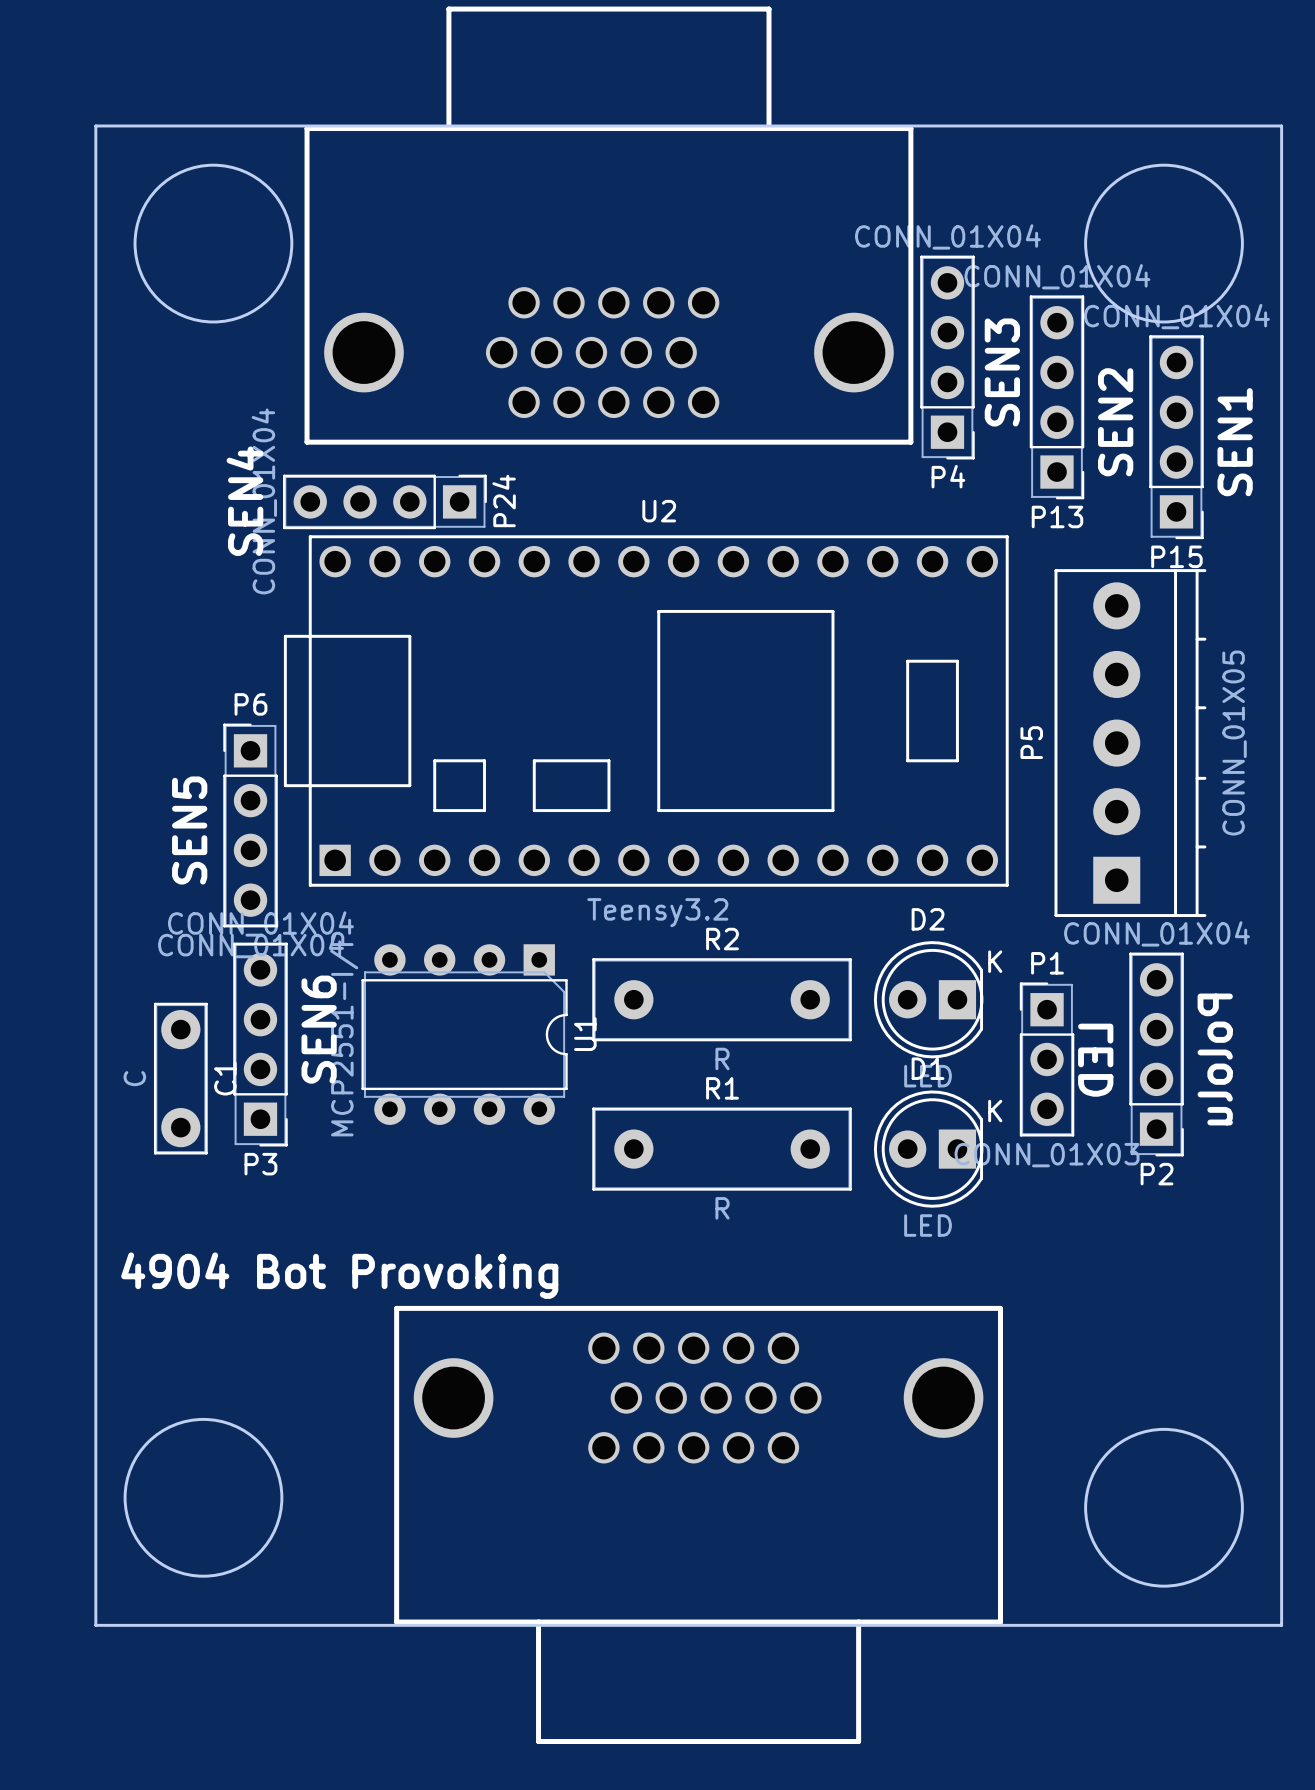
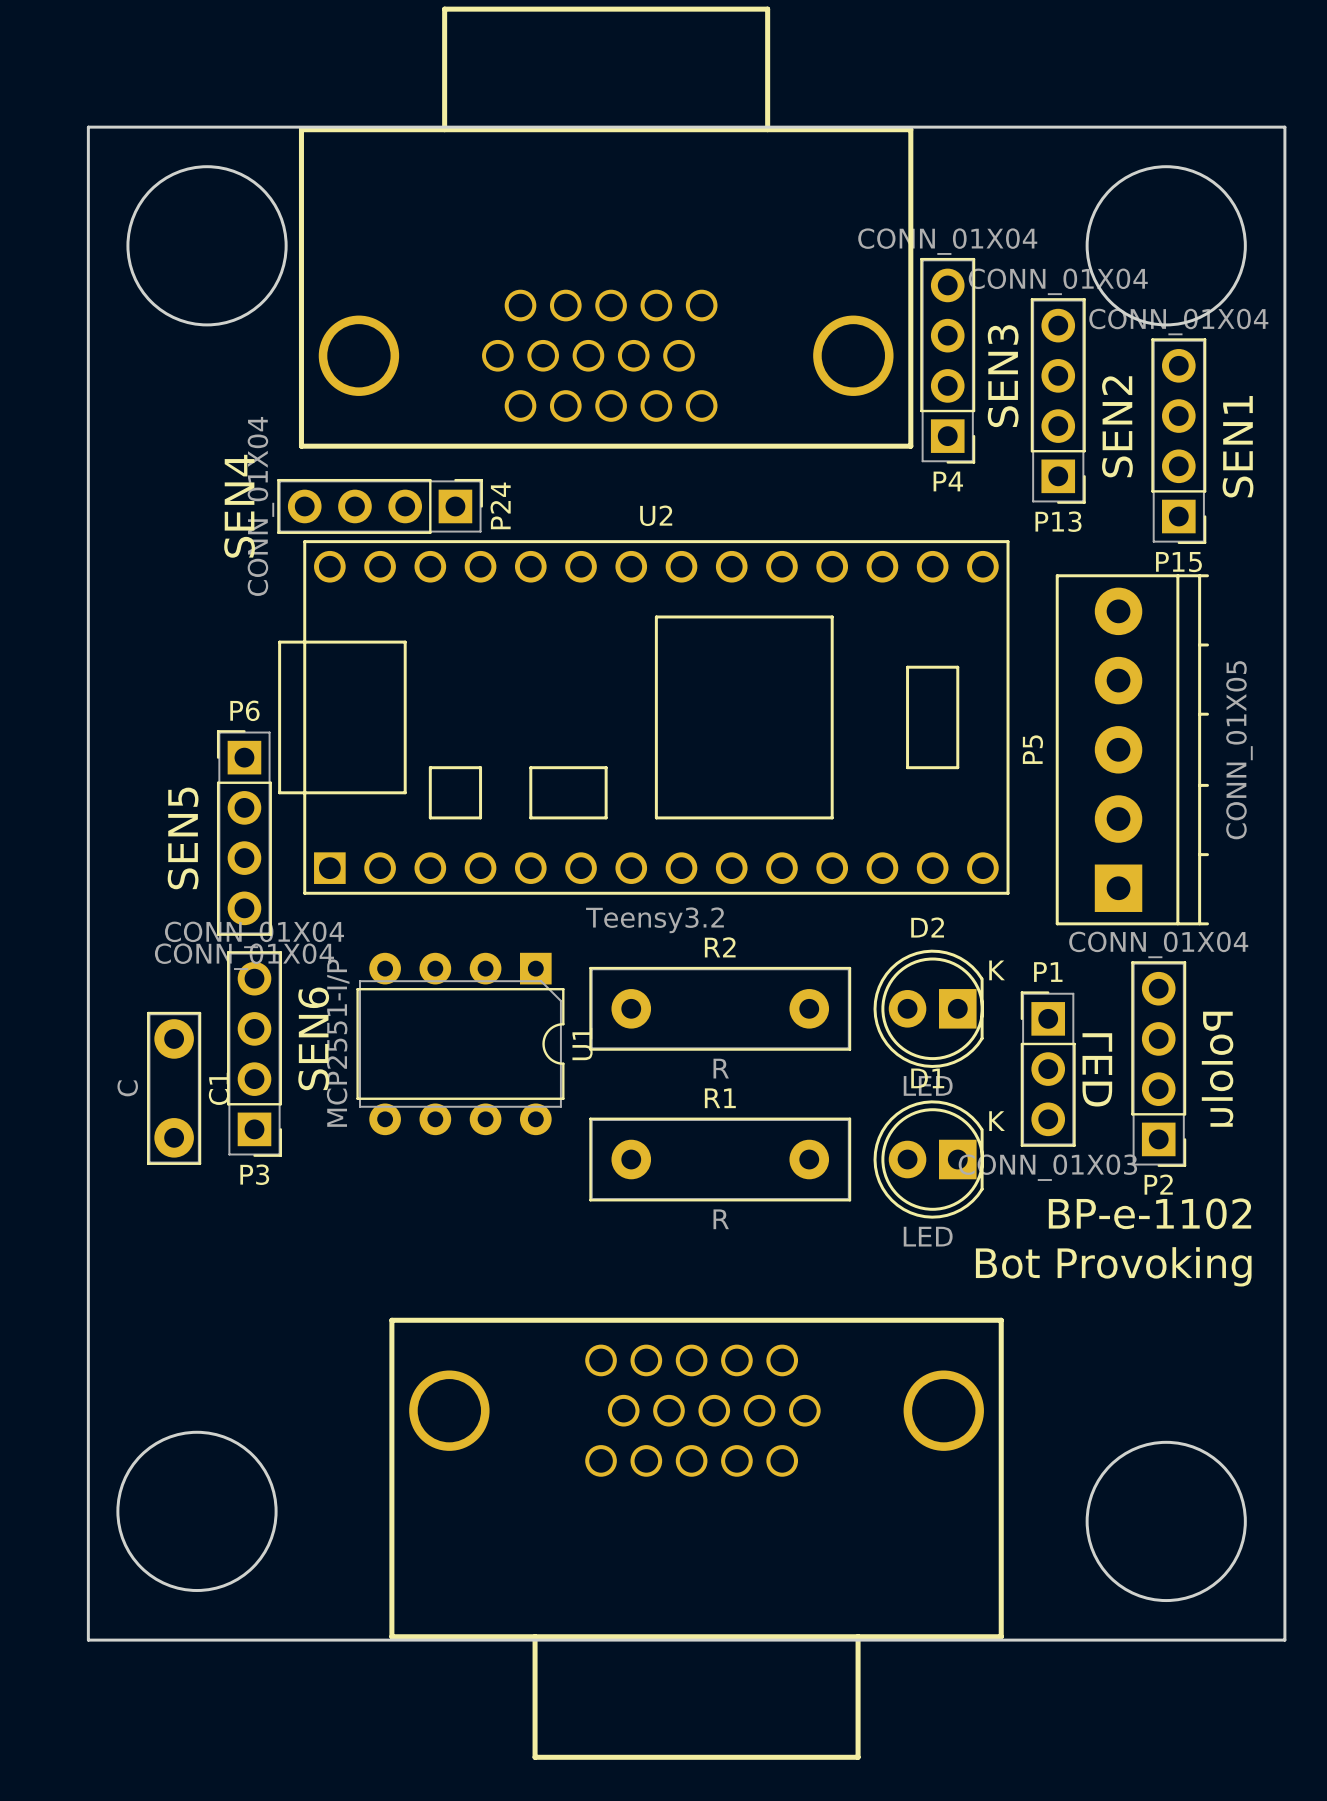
text: none -> BP-e-1102 (1149, 1213)
text: none -> Bot Provoking (1113, 1266)
text: 4904 Bot Provoking (339, 1275) -> none

